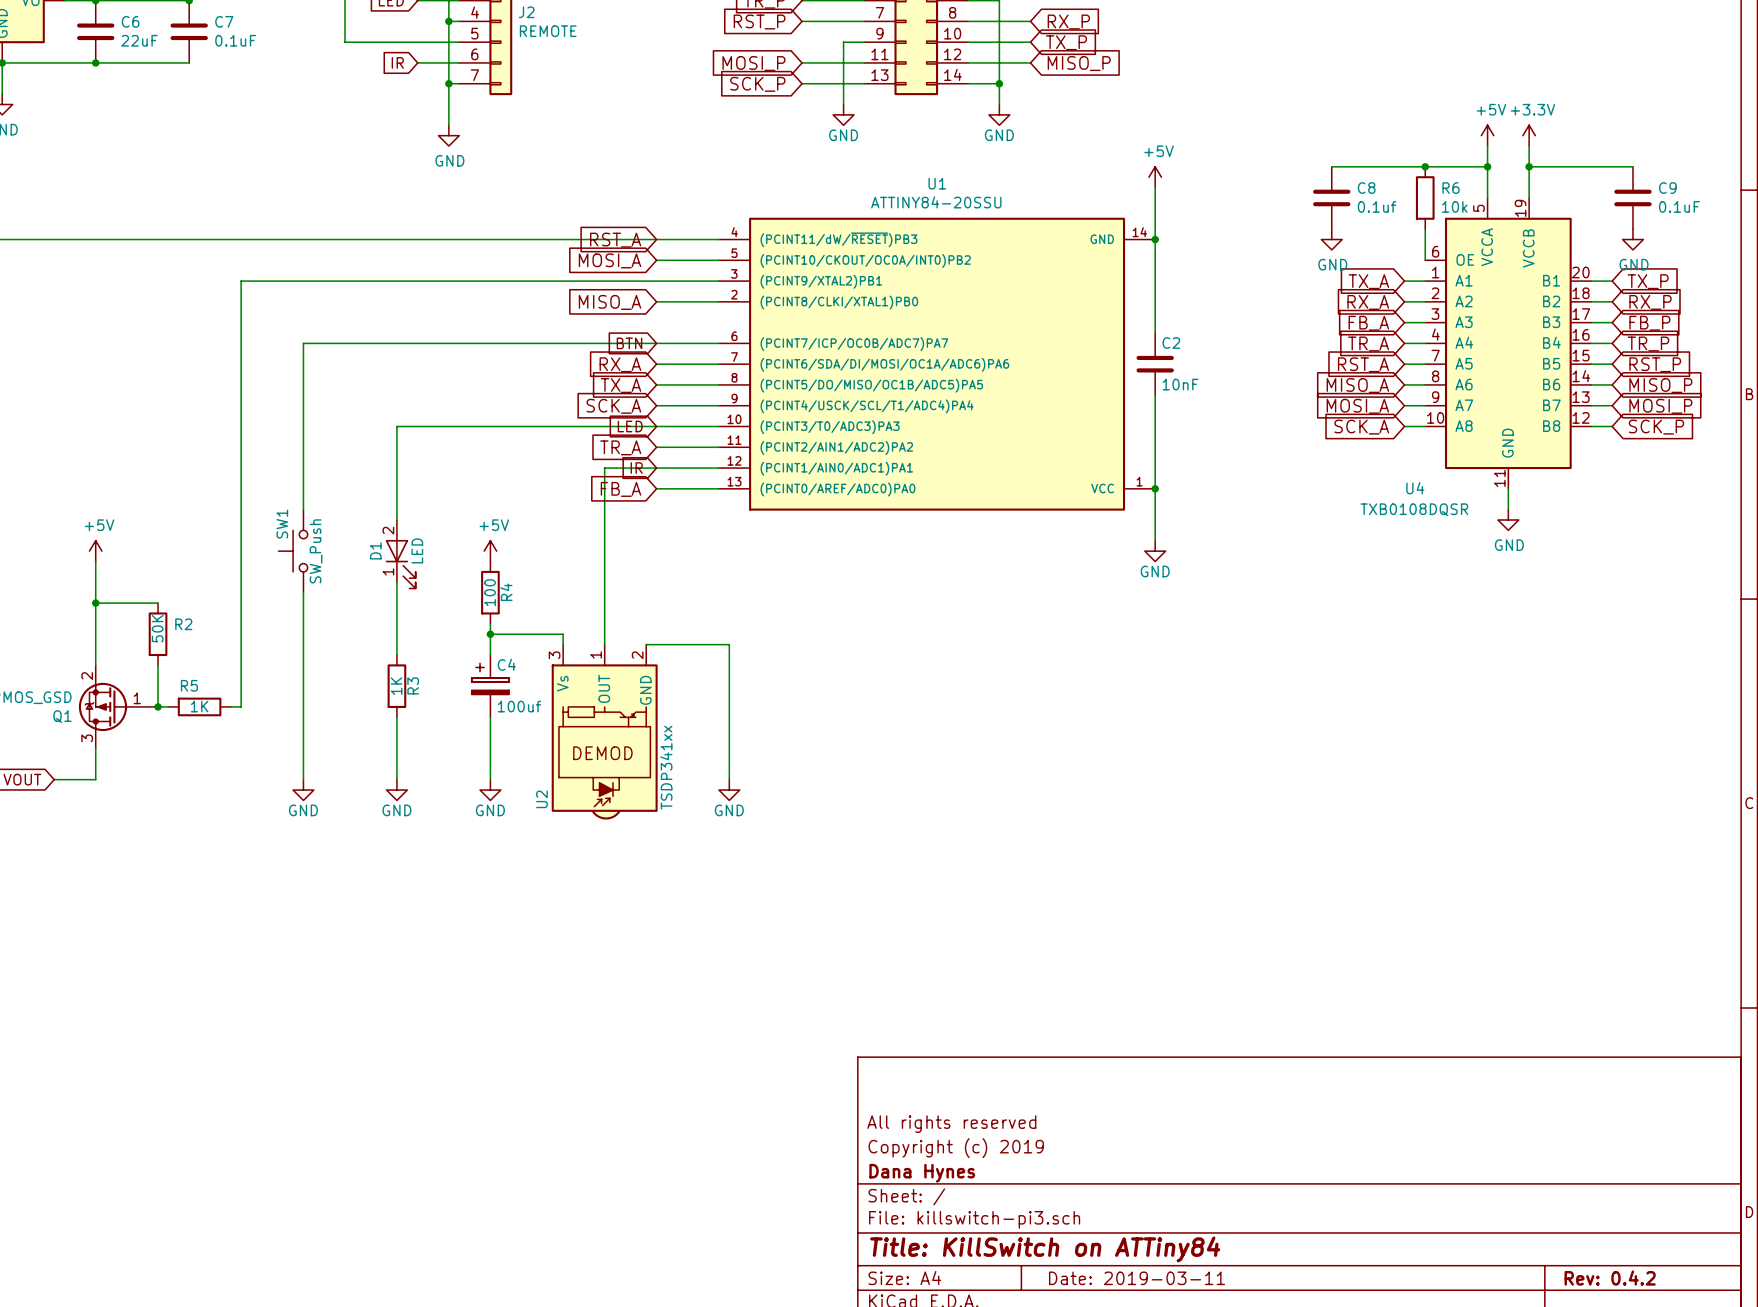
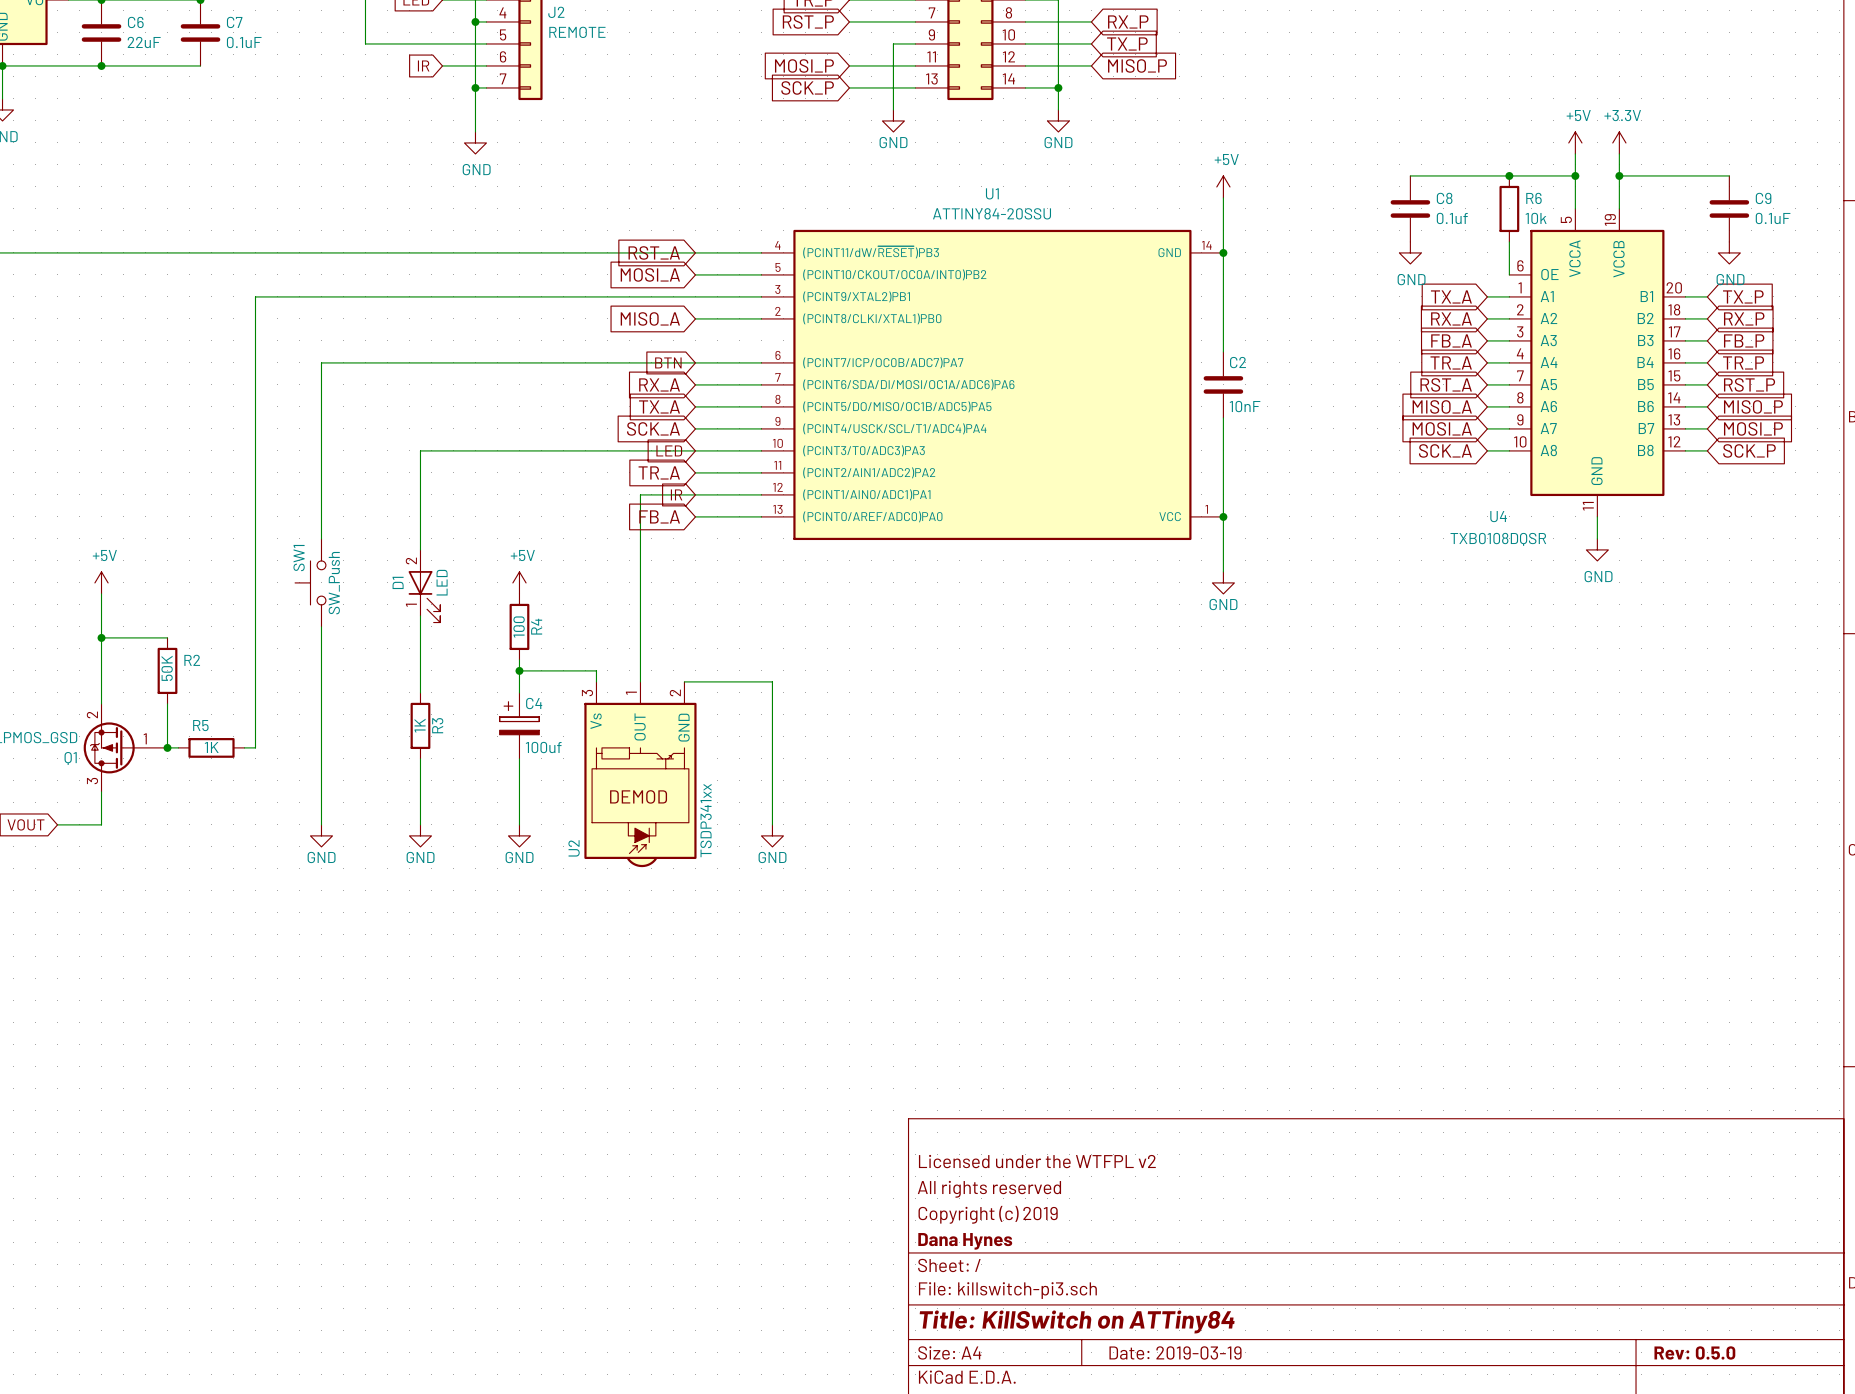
title block: none -> Licensed under the WTFPL v2 (1037, 1161)
title block: Date: 2019-03-11 (1137, 1278) -> Date: 2019-03-19 (1175, 1352)
title block: Rev: 0.4.2 (1610, 1278) -> Rev: 0.5.0 (1694, 1352)

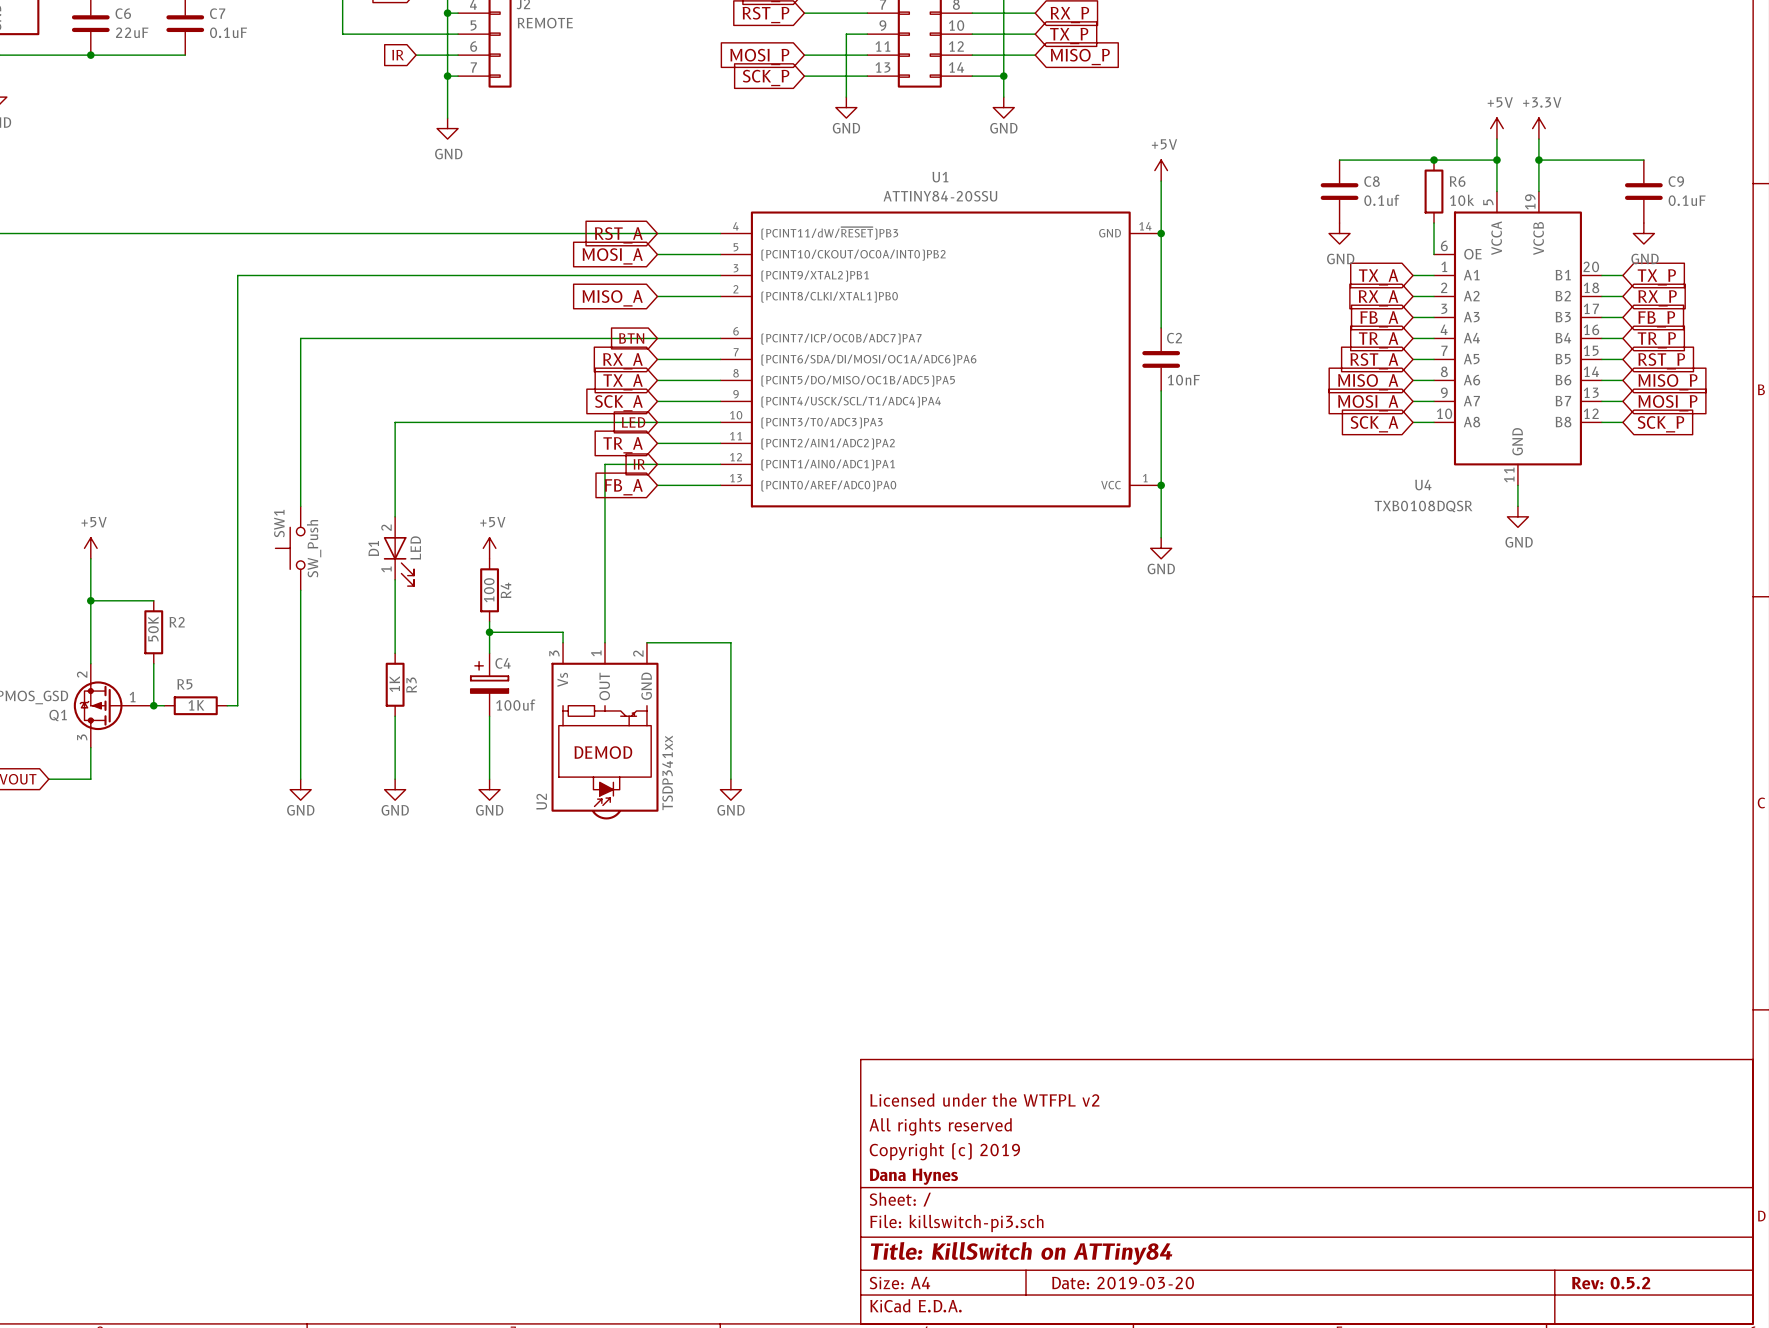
title block: Date: 2019-03-19 (1175, 1352) -> Date: 2019-03-20 (1123, 1283)
title block: Rev: 0.5.0 (1694, 1352) -> Rev: 0.5.2 (1611, 1283)

